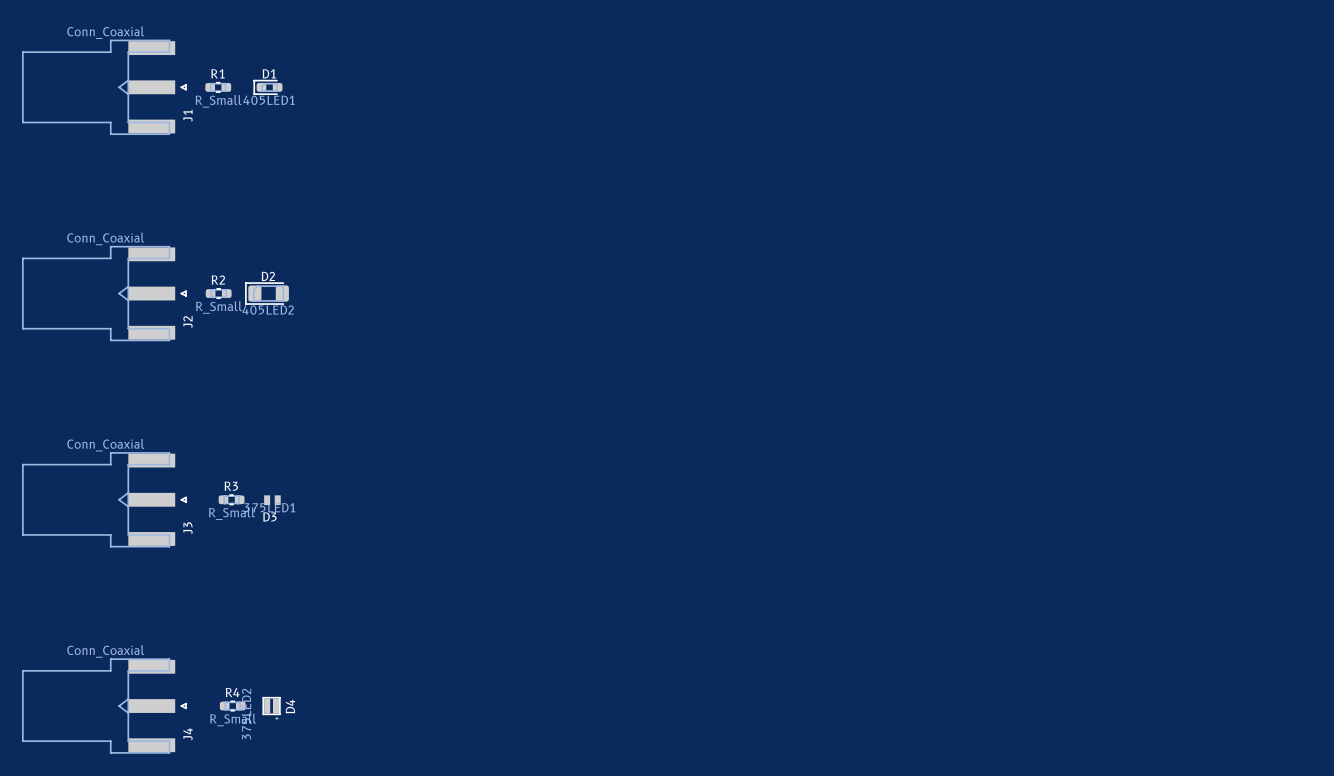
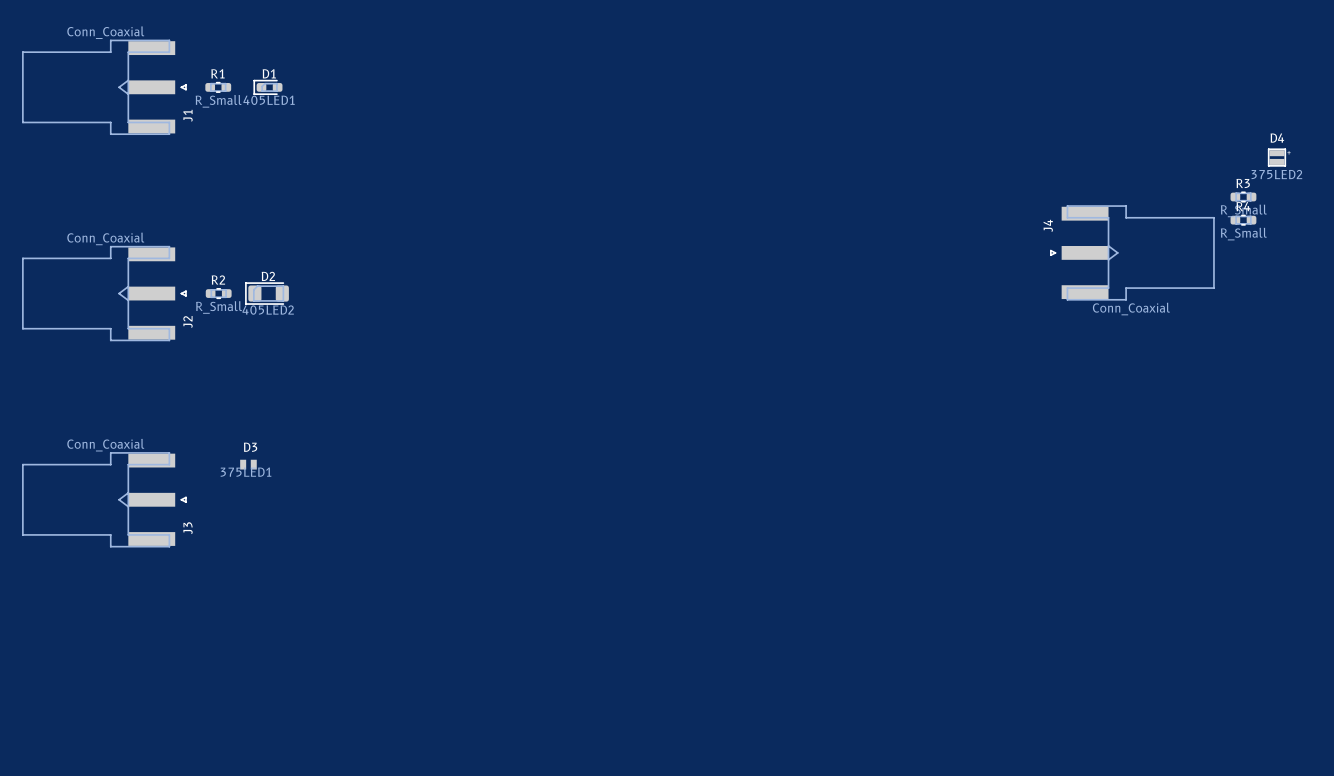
R3 position: (231, 499) -> (1243, 197)
D3 position: (272, 500) -> (248, 464)
D3 name position: D3 (269, 516) -> D3 (250, 447)
J4 rotation: 0° (104, 706) -> 180° (1132, 252)
J4 position: (104, 706) -> (1132, 252)
R4 position: (232, 706) -> (1243, 220)
D4 rotation: 0° (271, 706) -> 90° counterclockwise (1276, 157)
D4 position: (271, 706) -> (1276, 157)

